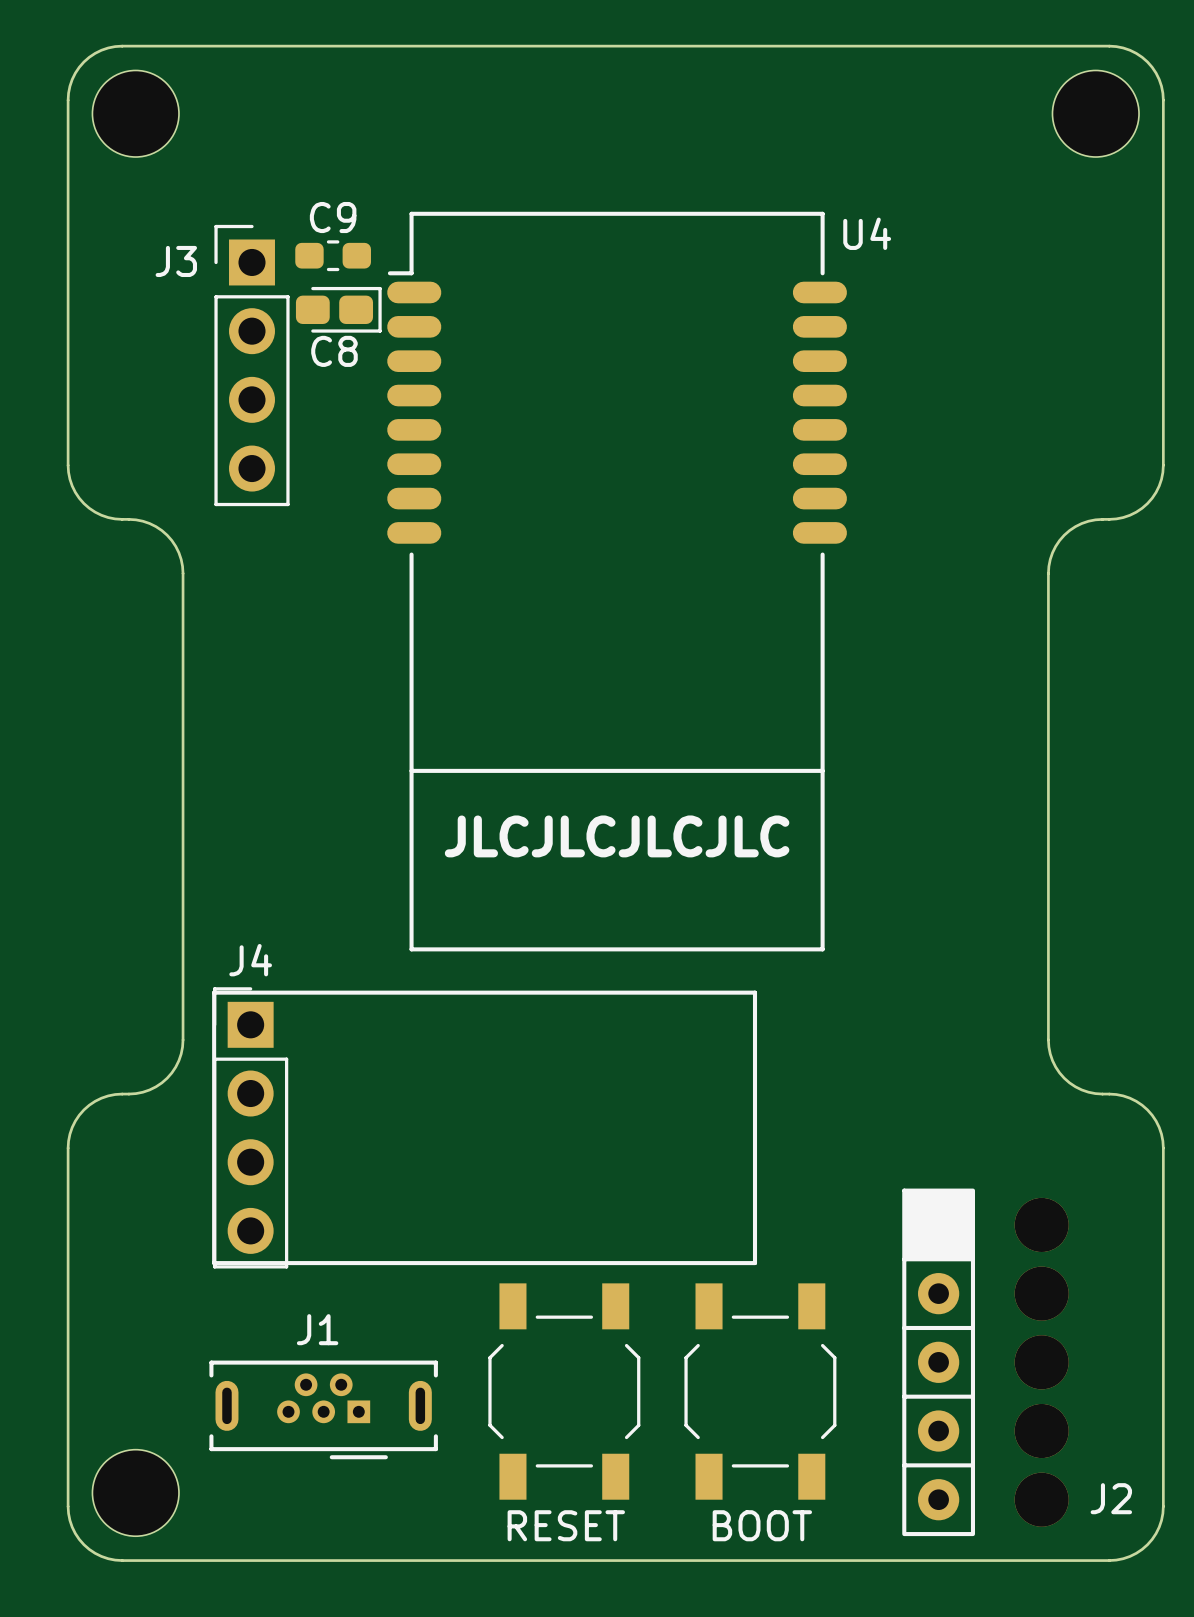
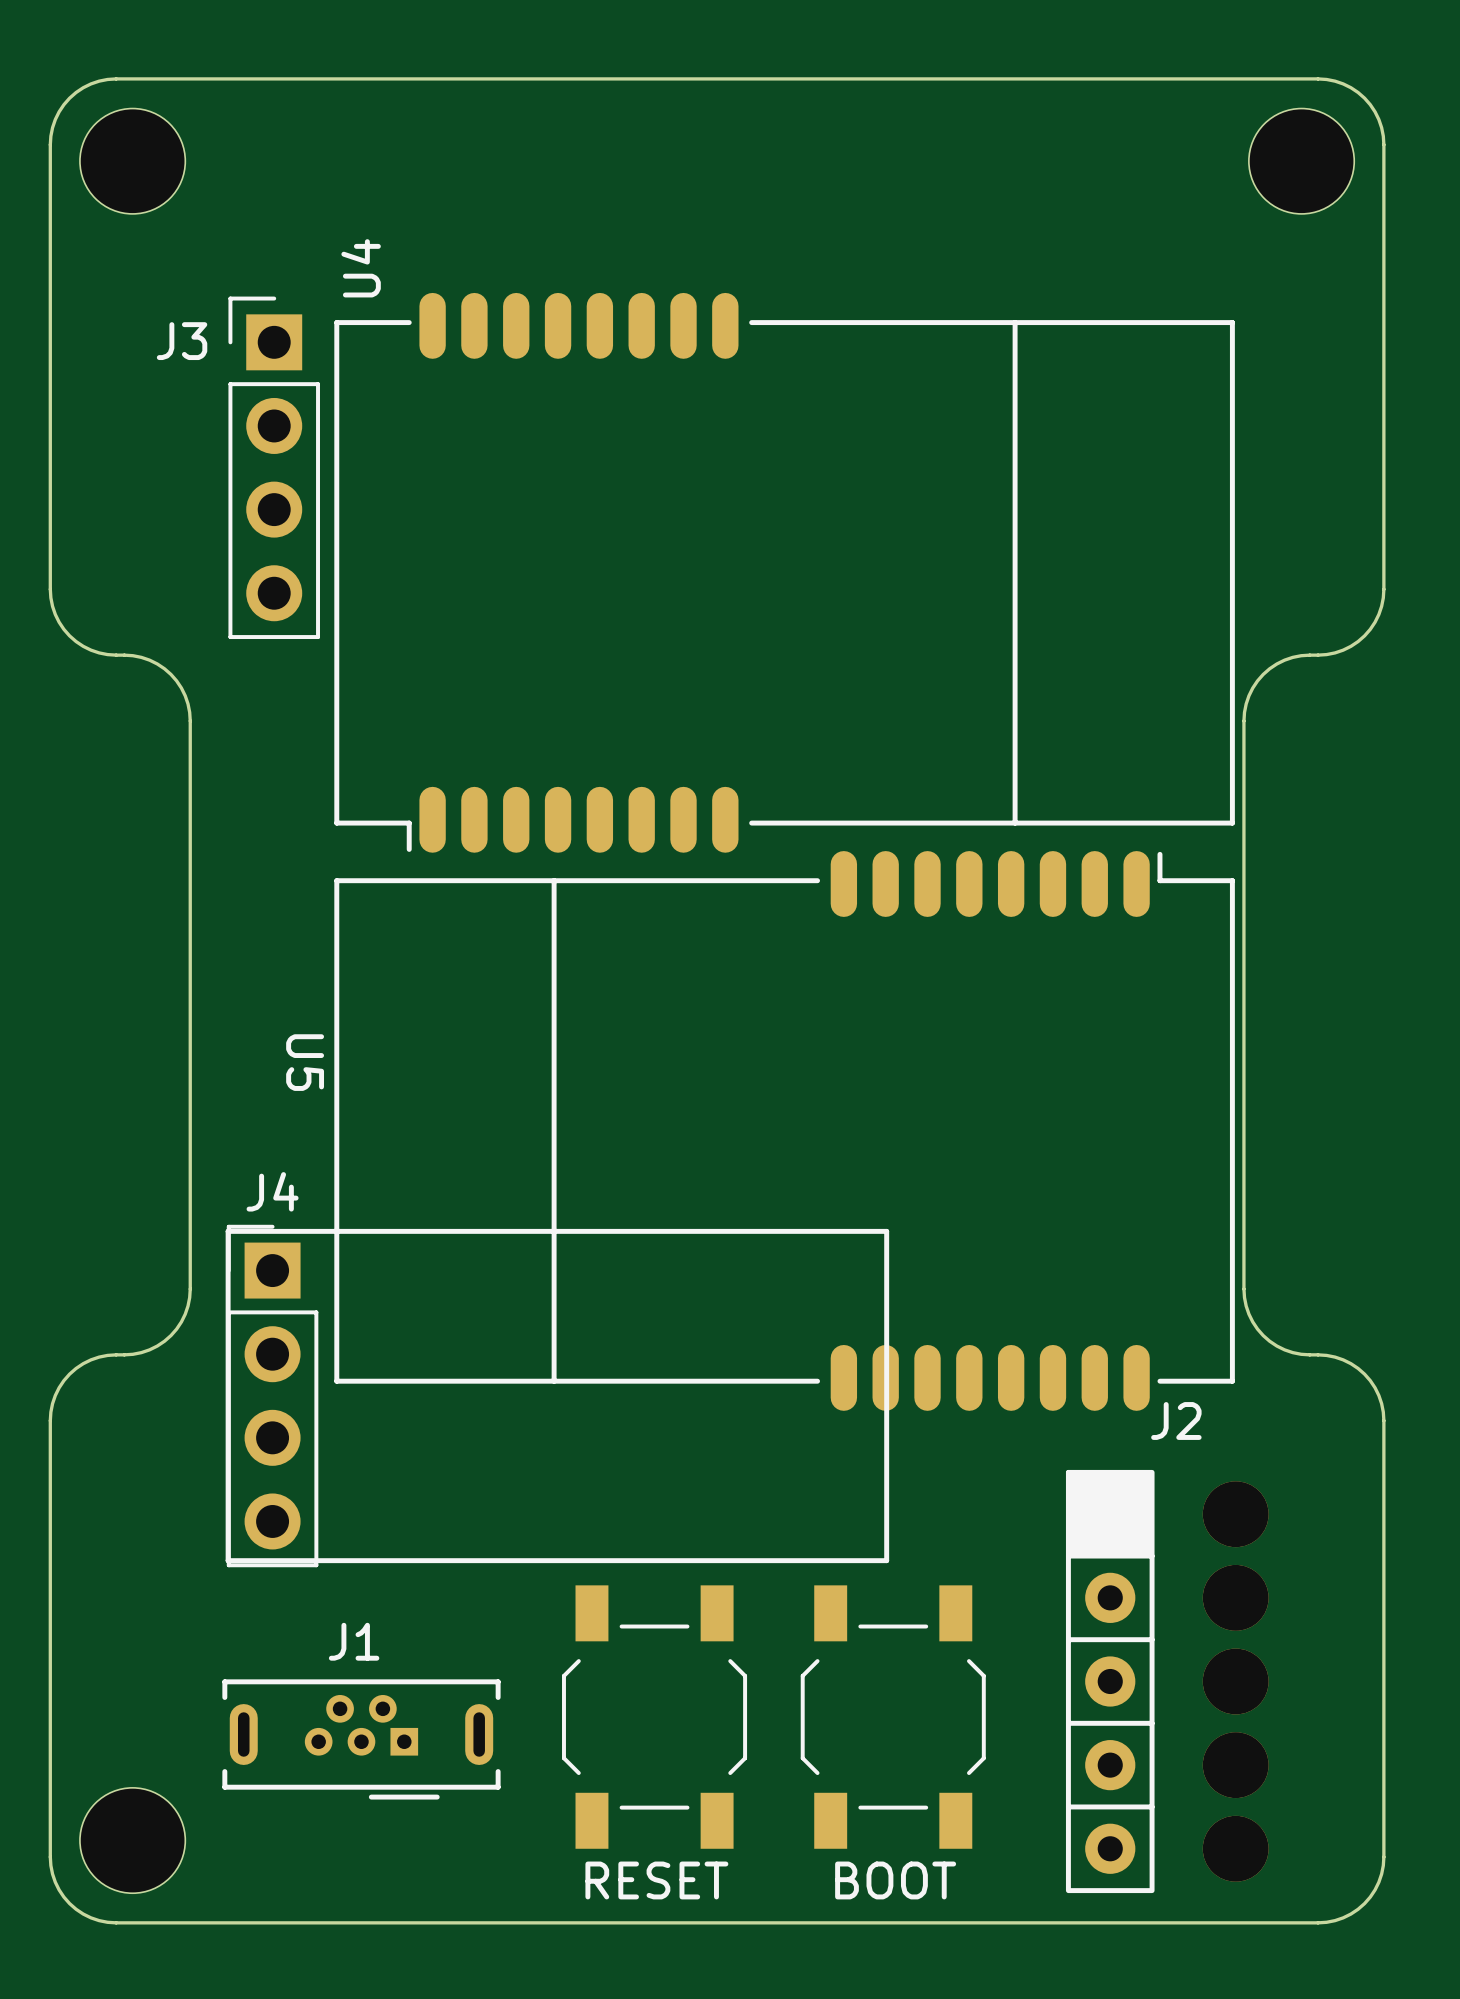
C9: (333, 255) -> none
C8: (338, 309) -> none
U4 rotation: 0° (617, 581) -> 90° counterclockwise (784, 572)
text: JLCJLCJLCJLC (617, 836) -> none
U5: none -> (784, 1130)
J2 name position: J2 (1111, 1498) -> J2 (1176, 1421)

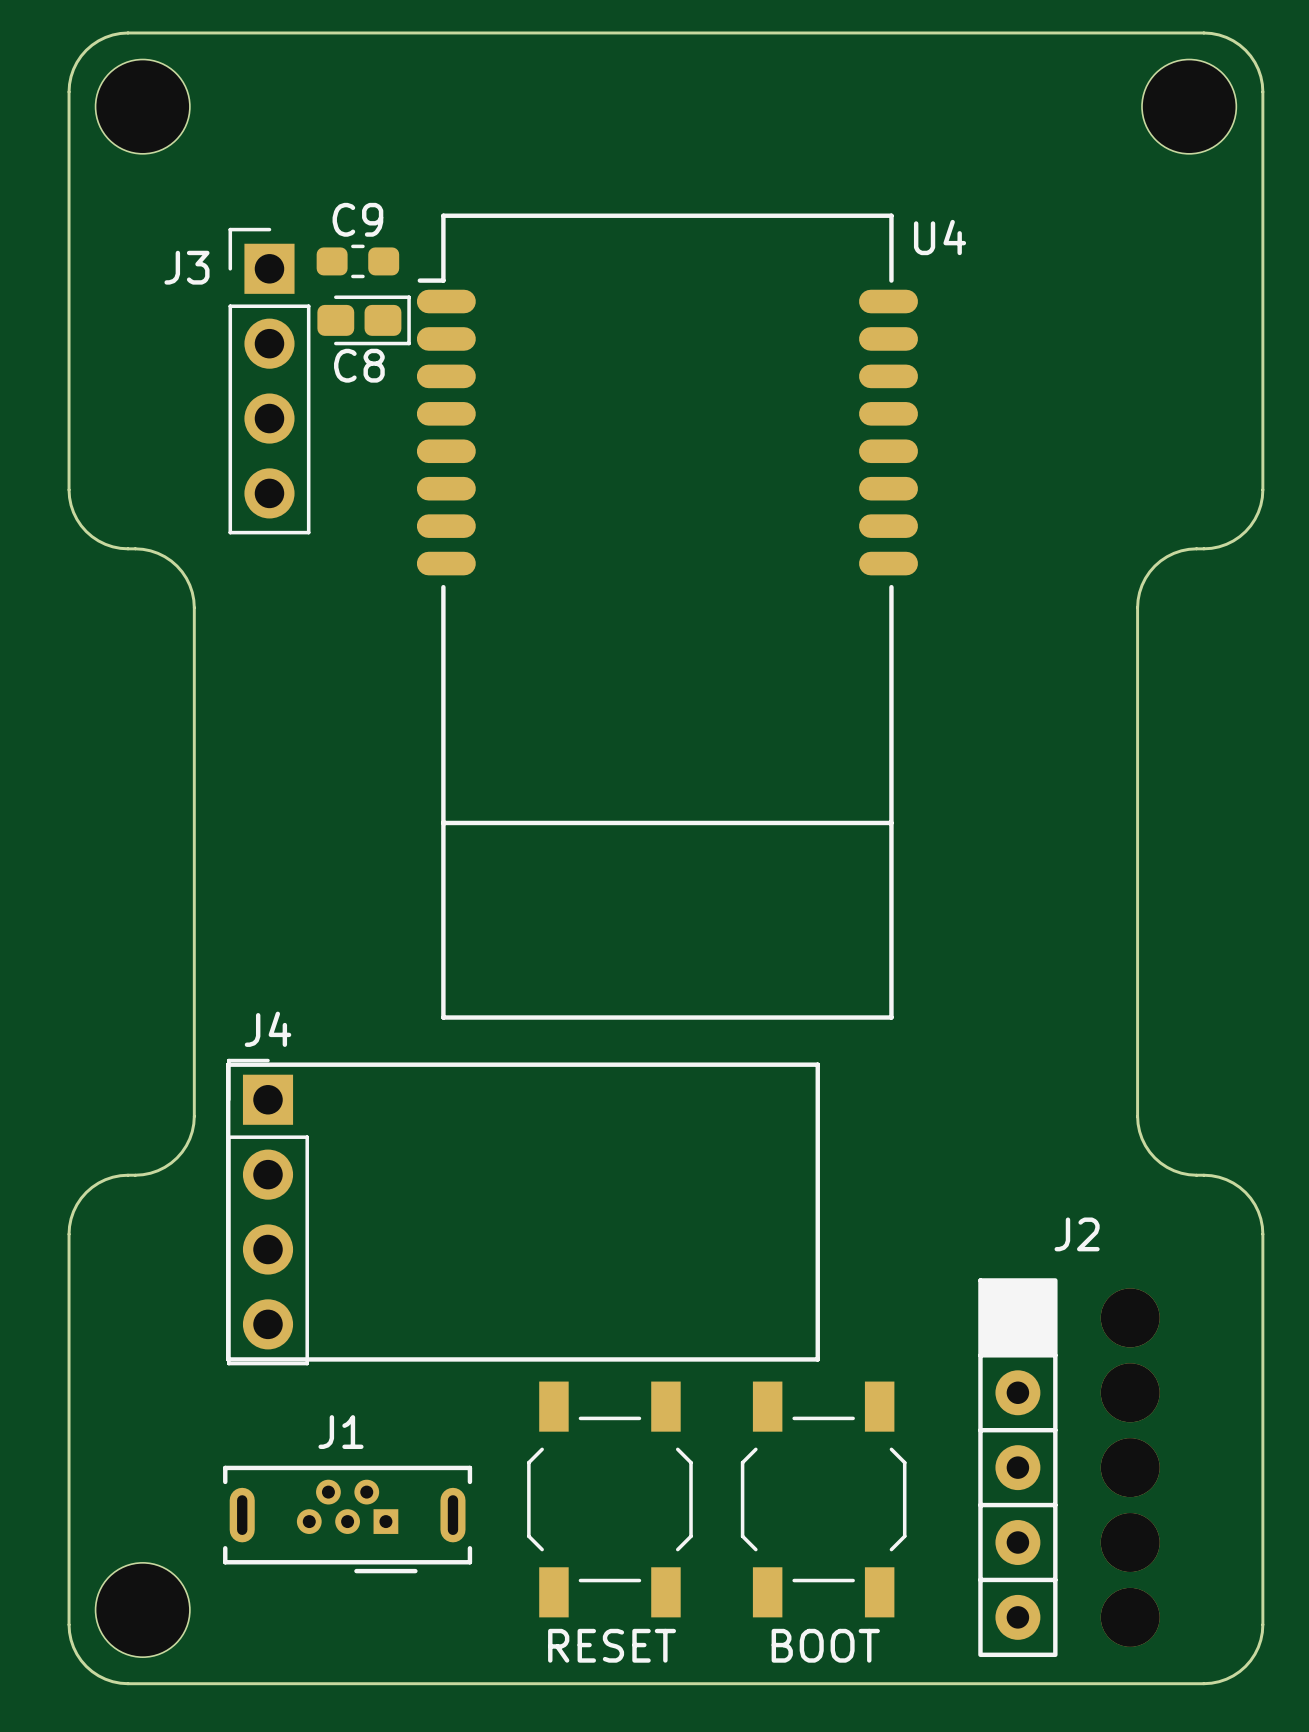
C9: none -> (357, 261)
C8: none -> (364, 320)
U4 rotation: 0° (784, 572) -> 90° clockwise (667, 616)
U5: (784, 1130) -> none

